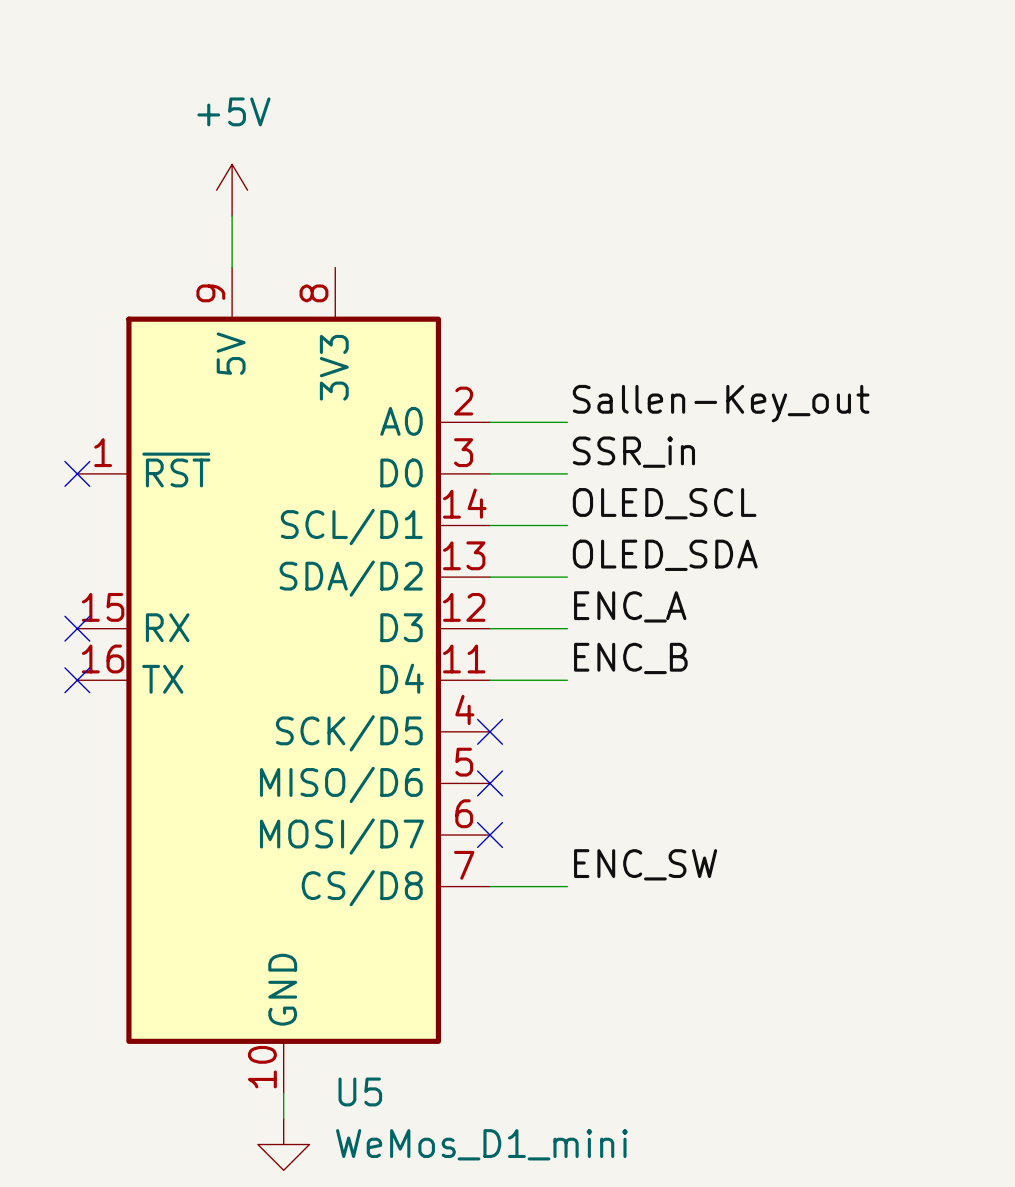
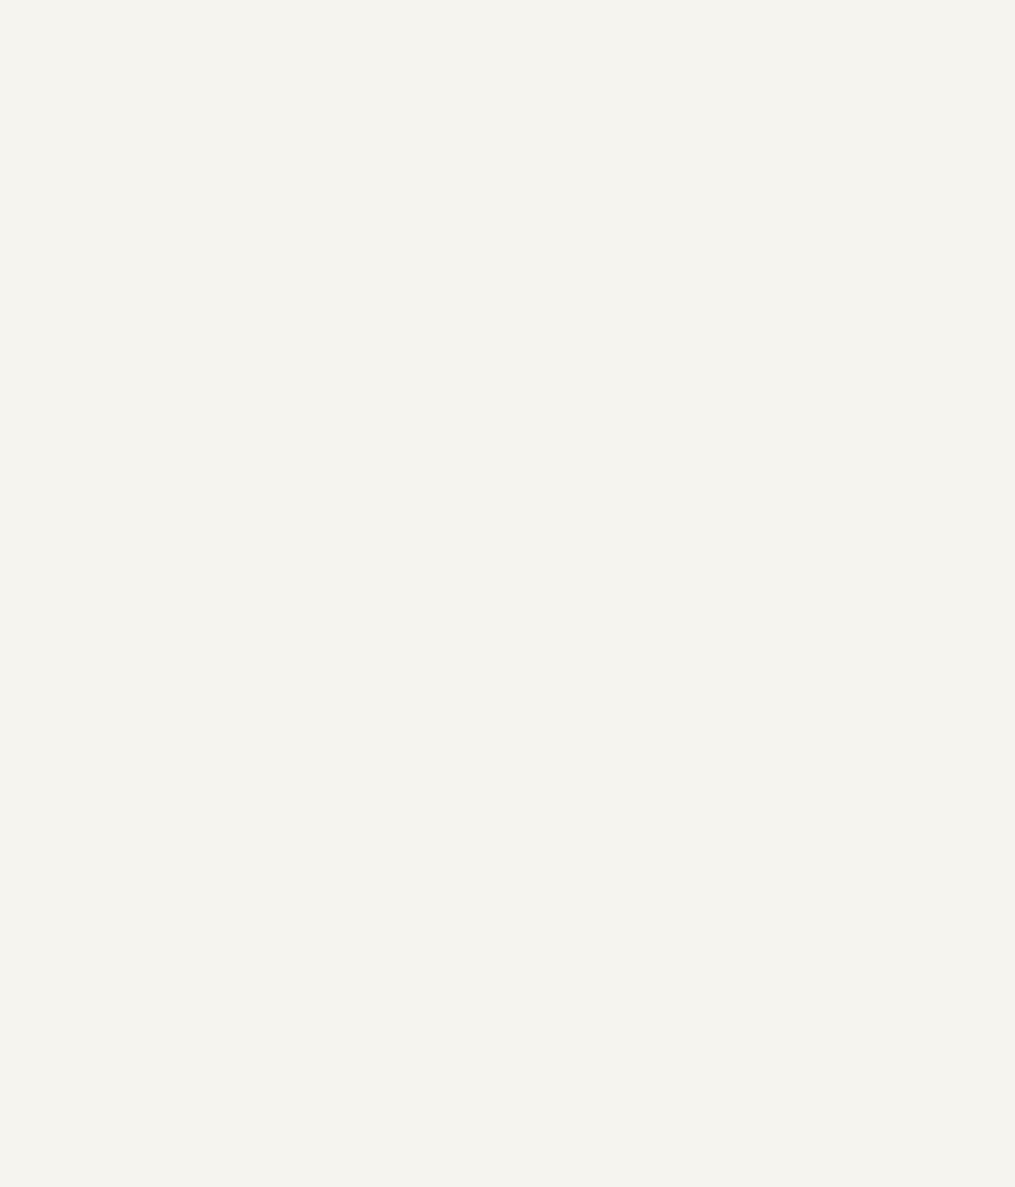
power symbol: +5V (232, 190) -> none
wire: (232, 216) (232, 267) -> none
label: Sallen-Key_out (721, 403) -> none
wire: (490, 422) (567, 422) -> none
label: SSR_in (633, 452) -> none
no-connect mark: (77, 473) -> none
wire: (490, 473) (567, 473) -> none
label: OLED_SCL (664, 503) -> none
wire: (490, 525) (567, 525) -> none
label: OLED_SDA (665, 555) -> none
wire: (490, 577) (567, 577) -> none
label: ENC_A (630, 606) -> none
no-connect mark: (77, 628) -> none
wire: (490, 628) (567, 628) -> none
label: ENC_B (630, 658) -> none
no-connect mark: (77, 680) -> none
U5: WeMos_D1_mini (283, 680) -> none
wire: (490, 680) (567, 680) -> none
no-connect mark: (490, 731) -> none
no-connect mark: (490, 783) -> none
no-connect mark: (490, 835) -> none
label: ENC_SW (645, 864) -> none
wire: (490, 886) (567, 886) -> none
wire: (283, 1092) (283, 1118) -> none
power symbol: (283, 1144) -> none

